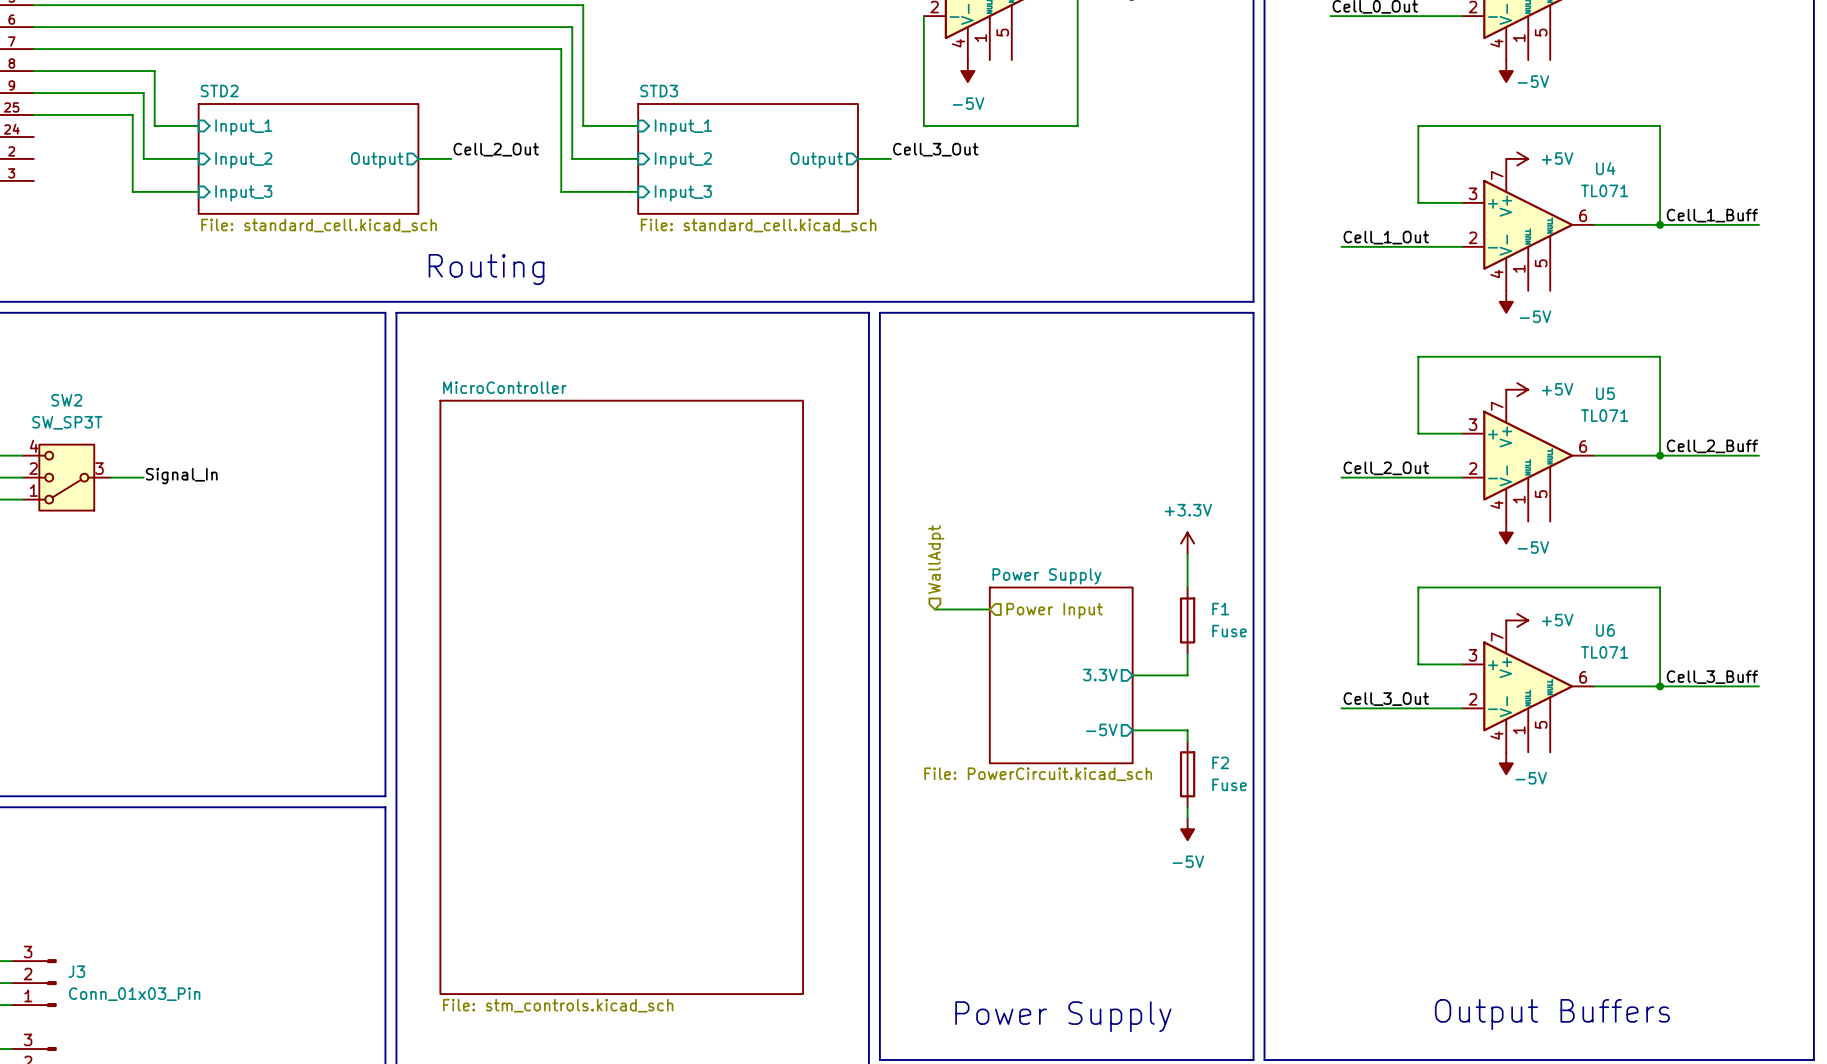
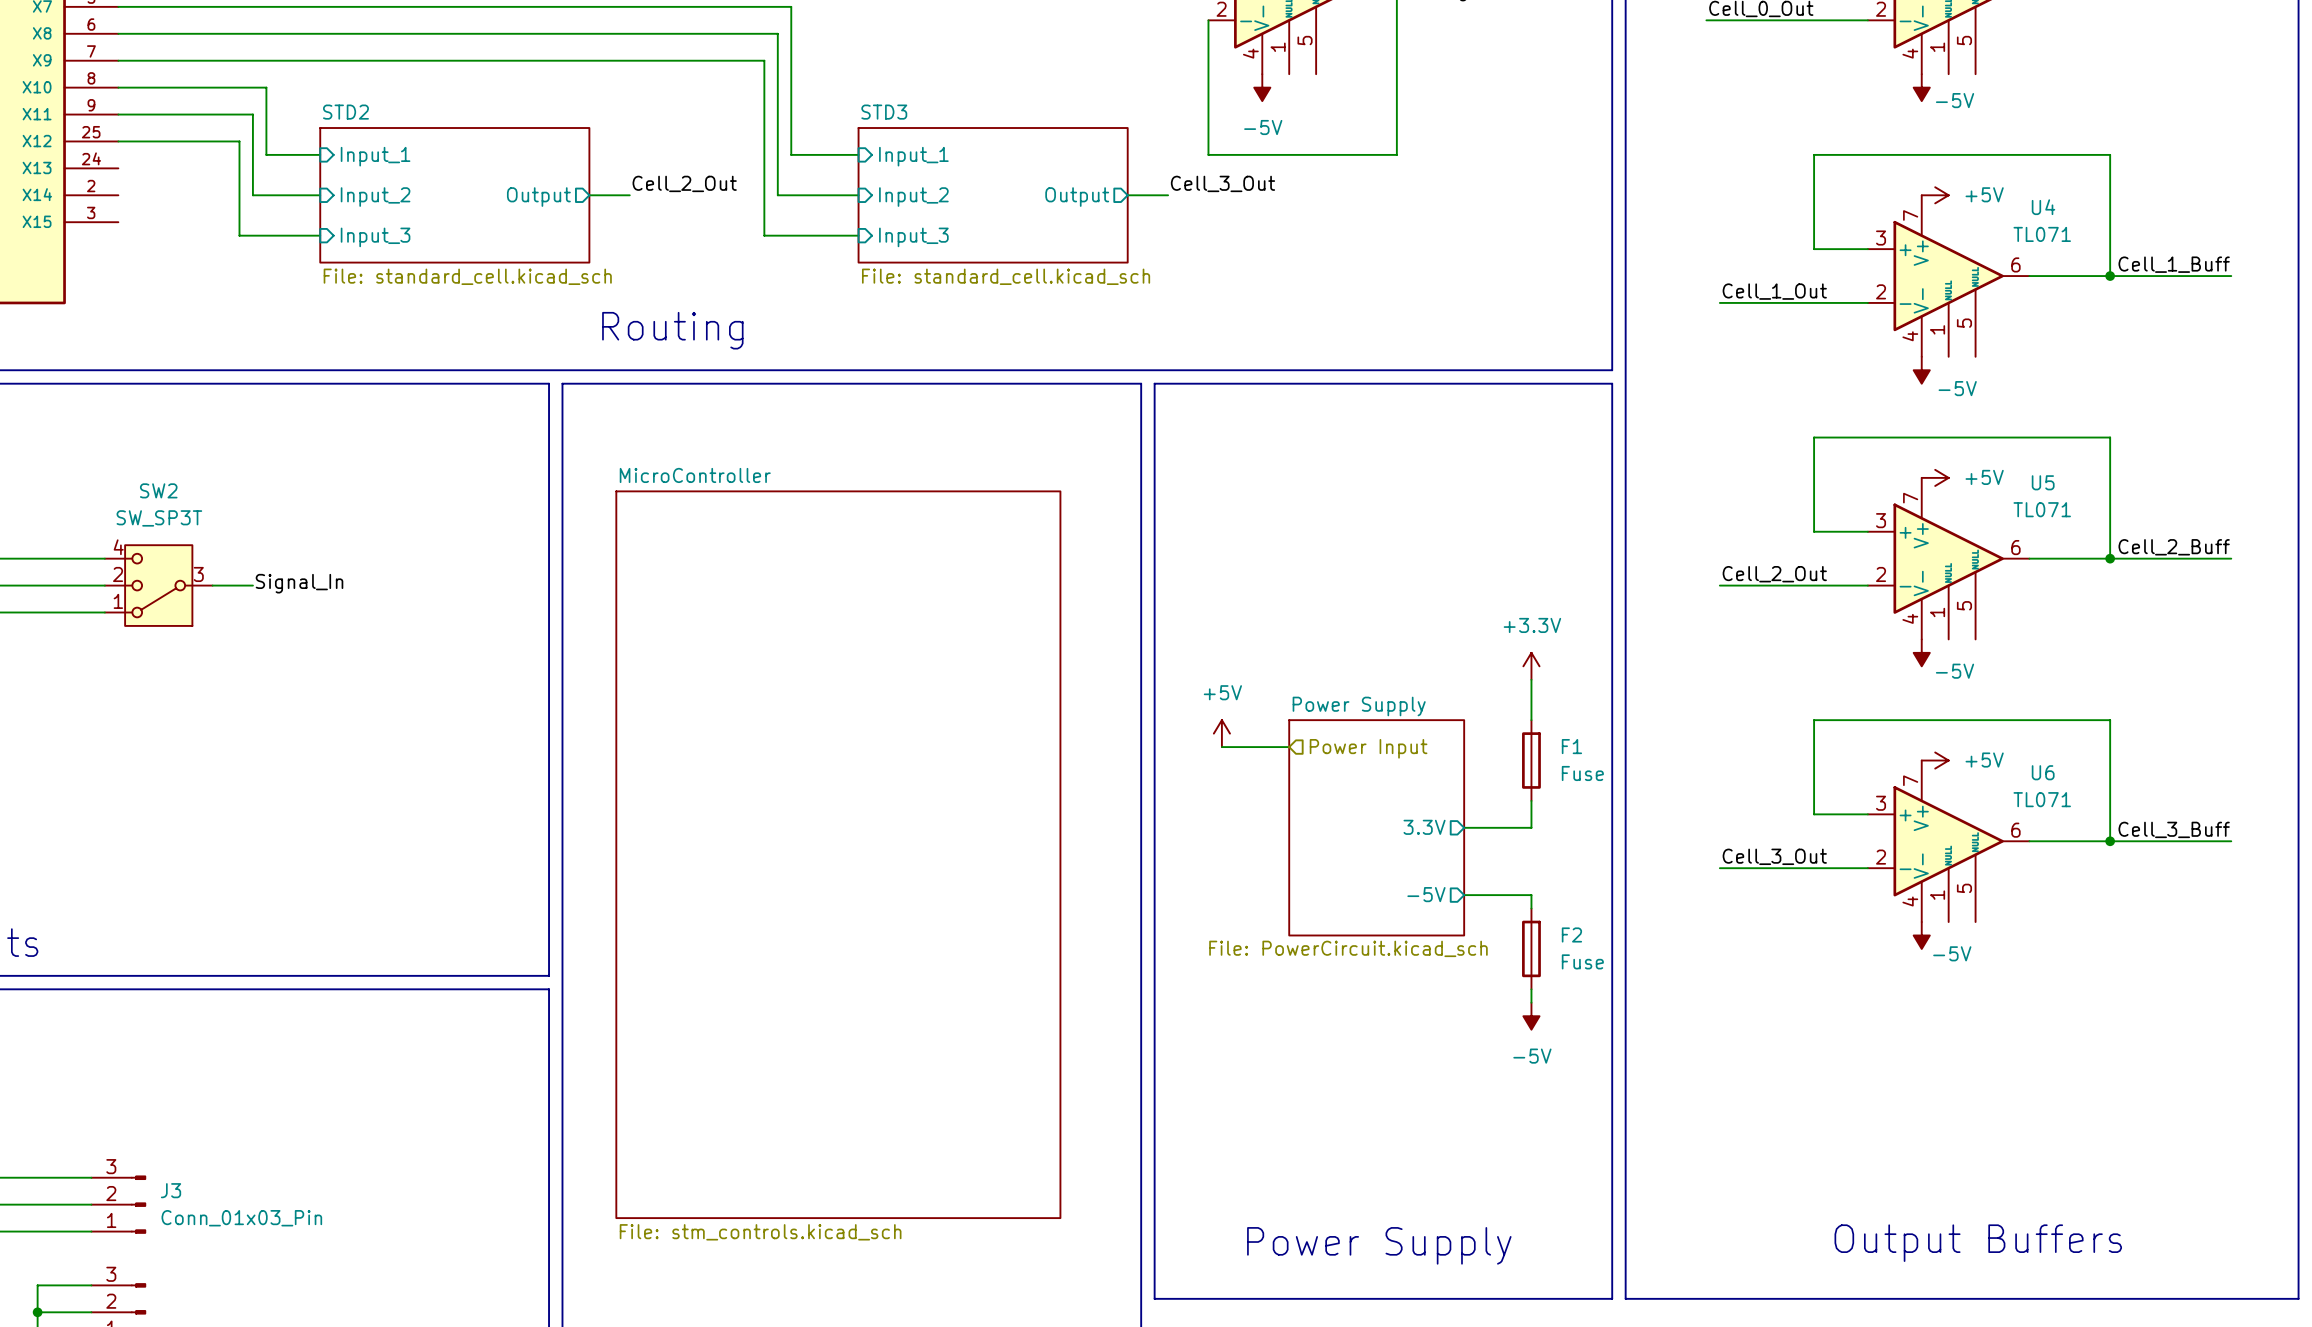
hierarchical label: WallAdpt (936, 559) -> none
power symbol: none -> +5V (1221, 733)

